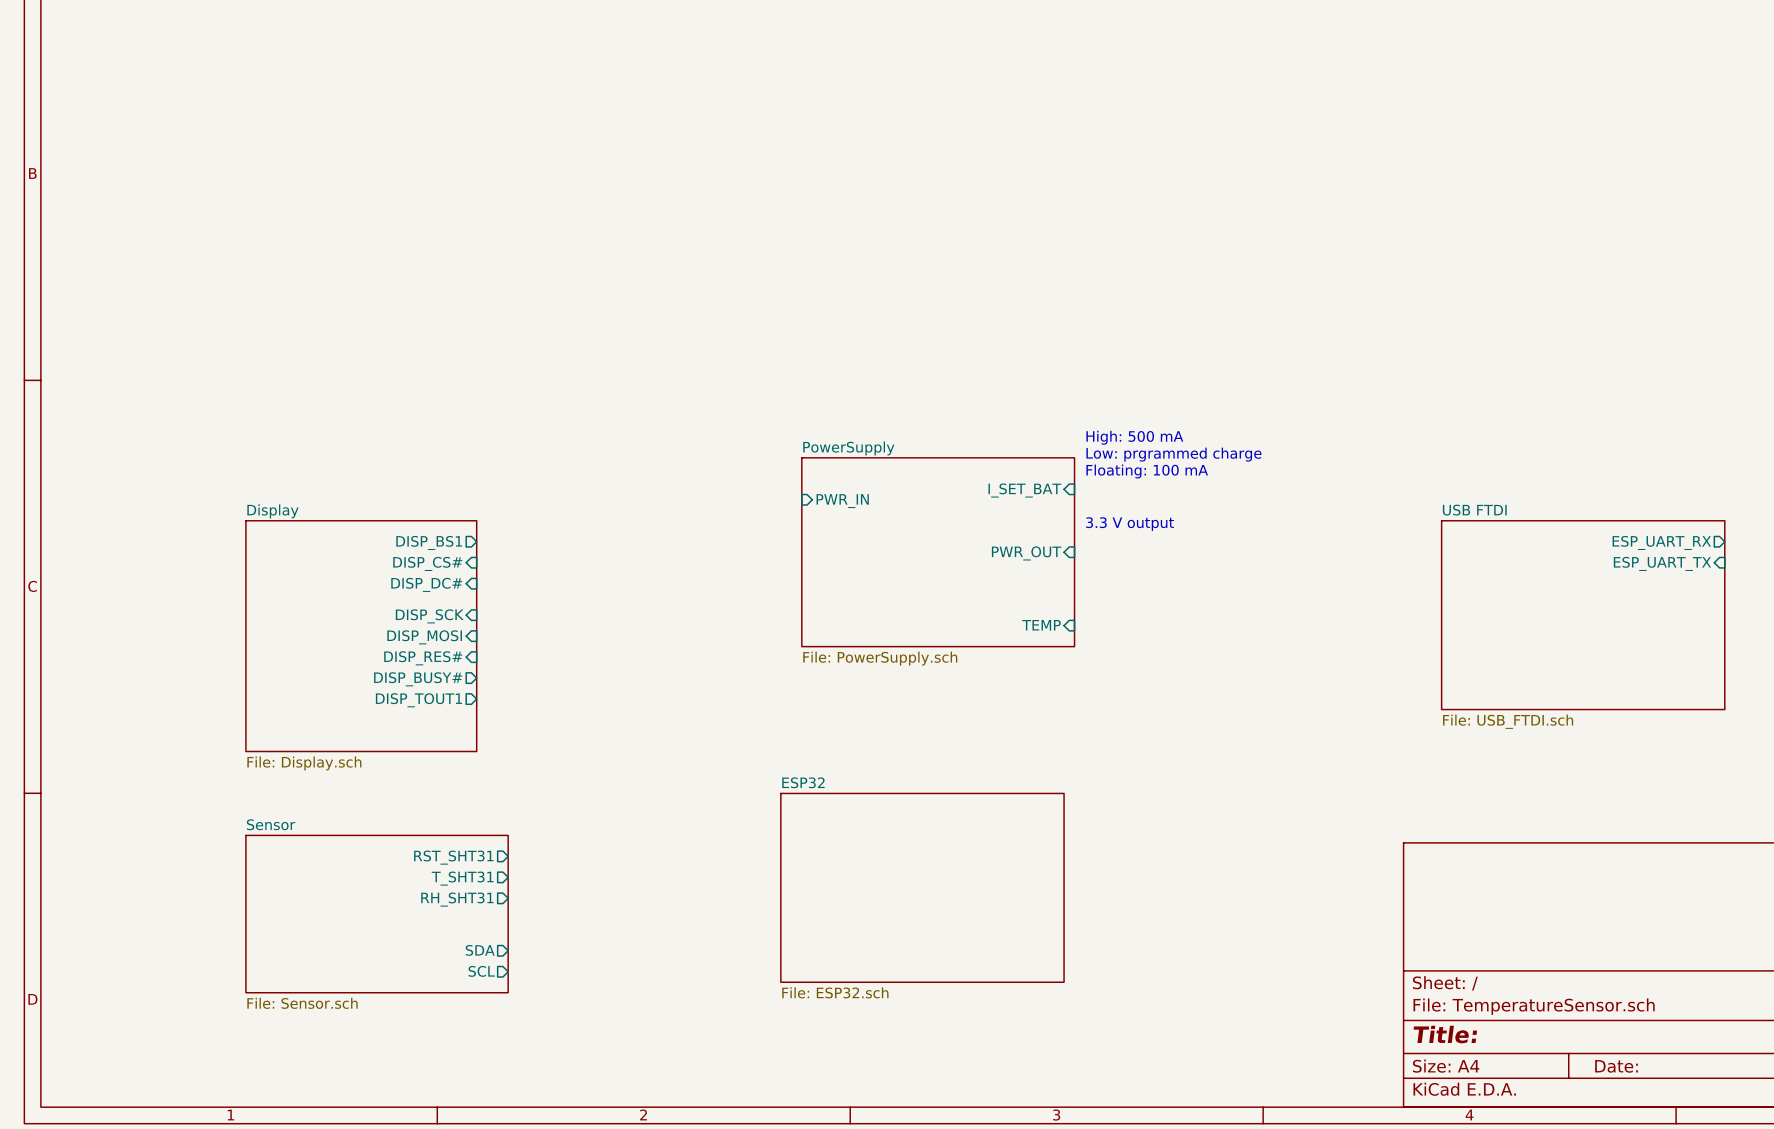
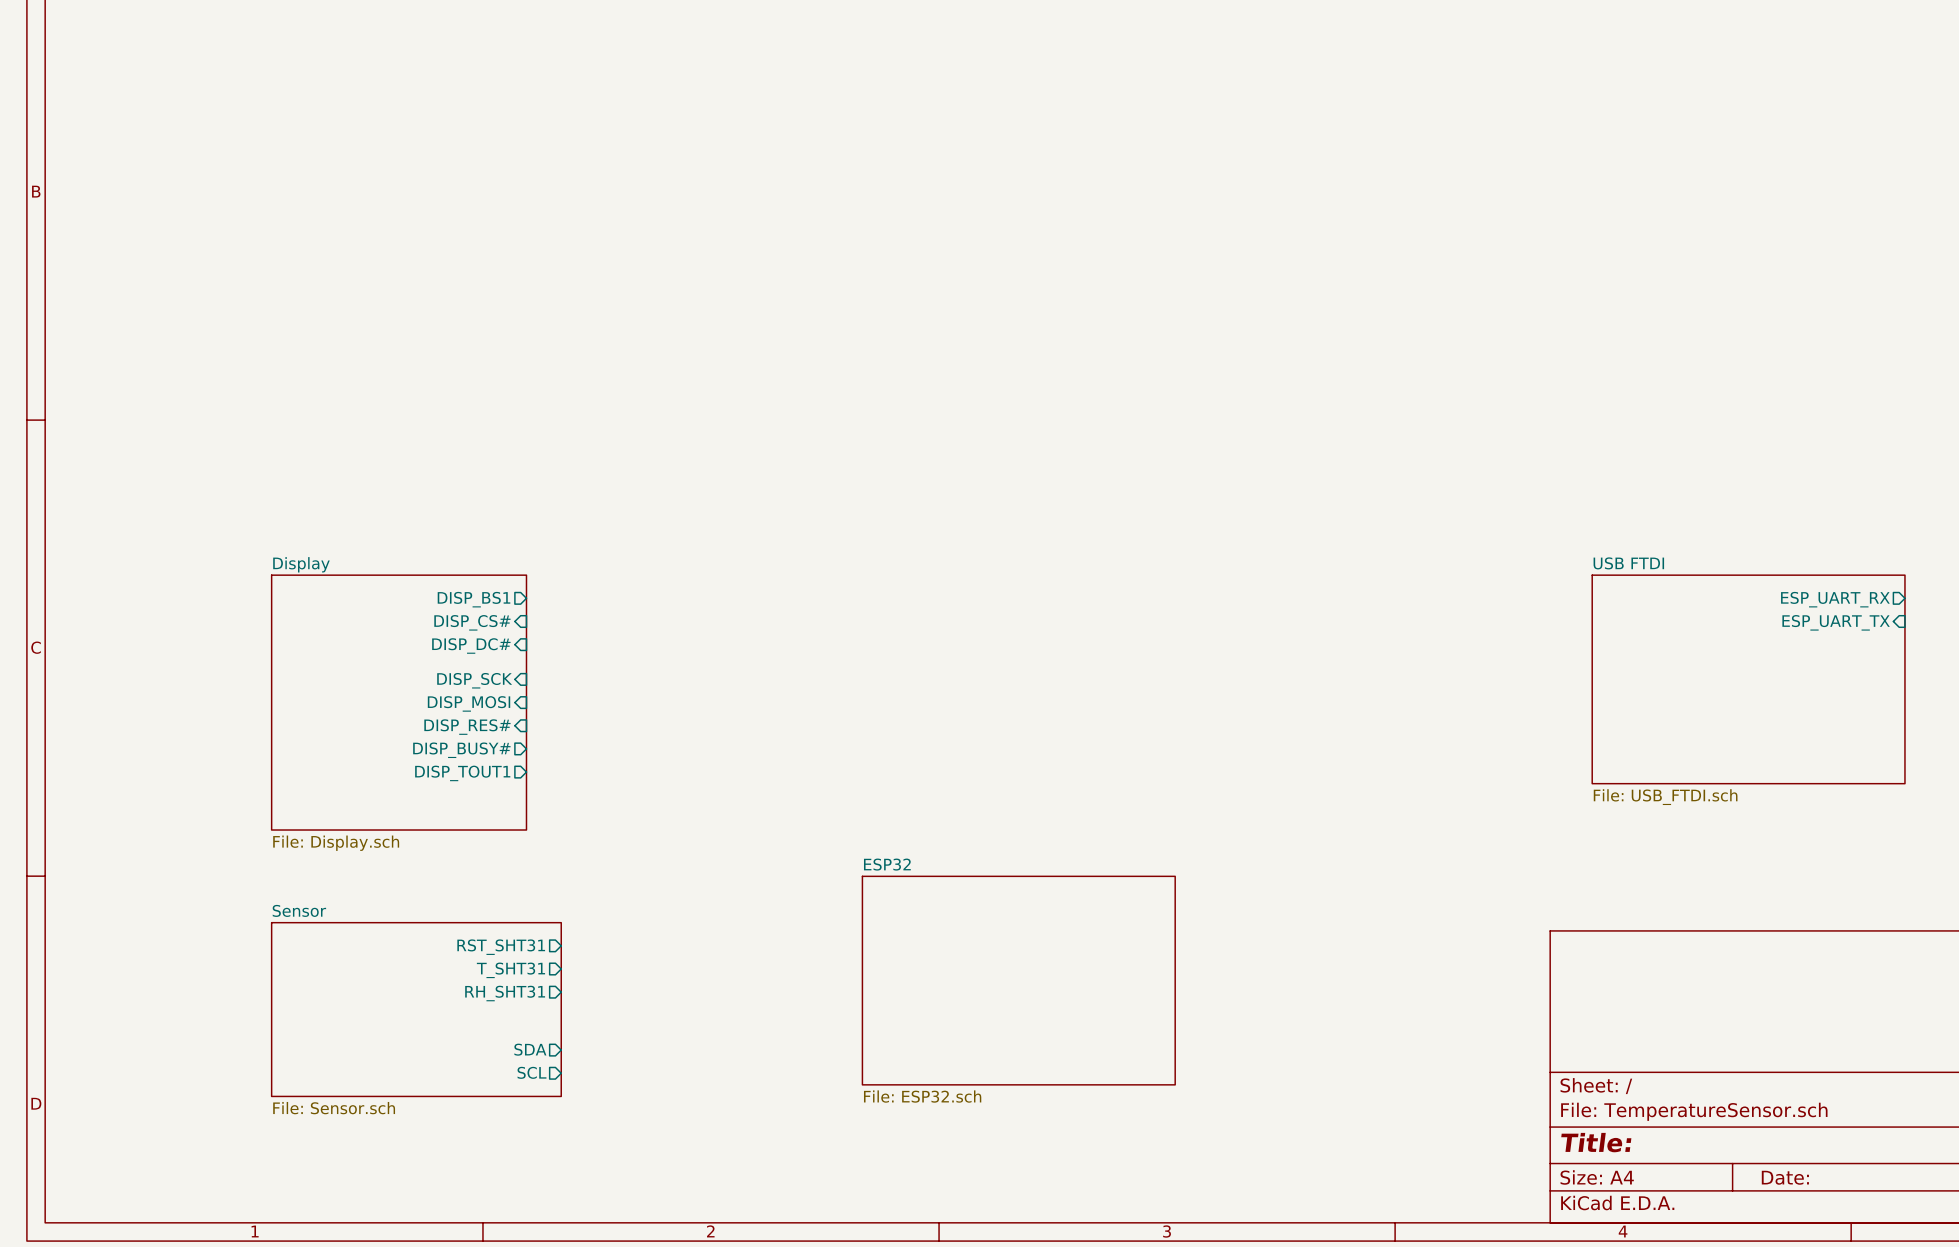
text: High: 500 mA (1134, 437) -> none
text: Low: prgrammed charge (1173, 454) -> none
text: Floating: 100 mA (1147, 471) -> none
sheet pin: I_SET_BAT (1024, 490) -> none
sheet pin: PWR_IN (842, 501) -> none
text: 3.3 V output (1130, 524) -> none
sheet PowerSupply: File: PowerSupply.sch (938, 552) -> none
sheet pin: PWR_OUT (1026, 553) -> none
sheet pin: TEMP (1041, 625) -> none

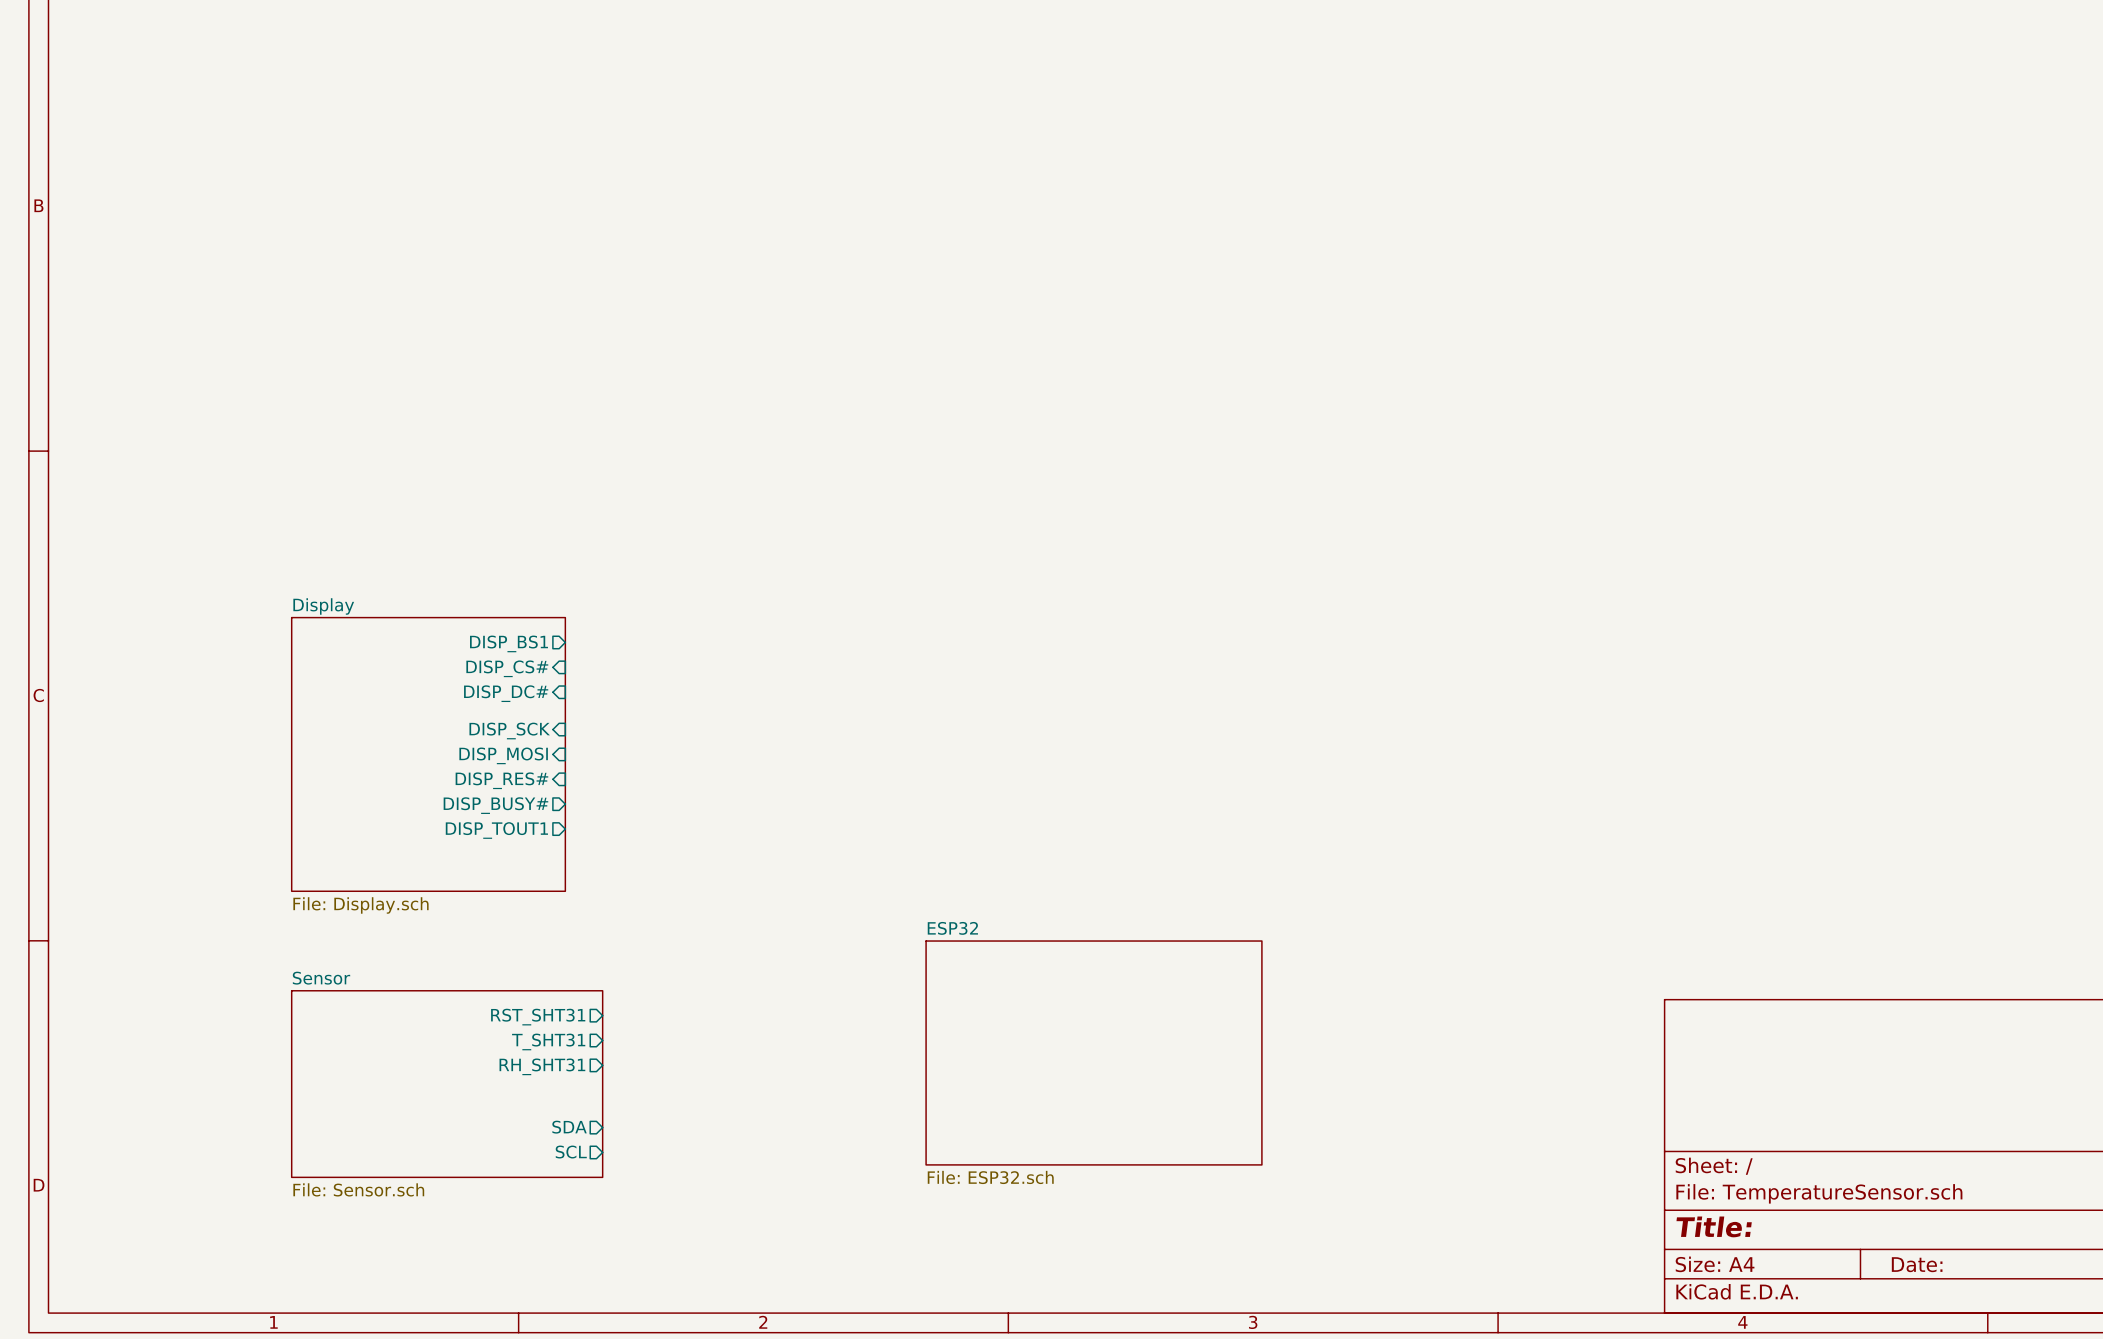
sheet pin: ESP_UART_RX (1835, 599) -> none
sheet pin: ESP_UART_TX (1836, 622) -> none
sheet USB FTDI: File: USB_FTDI.sch (1748, 679) -> none

